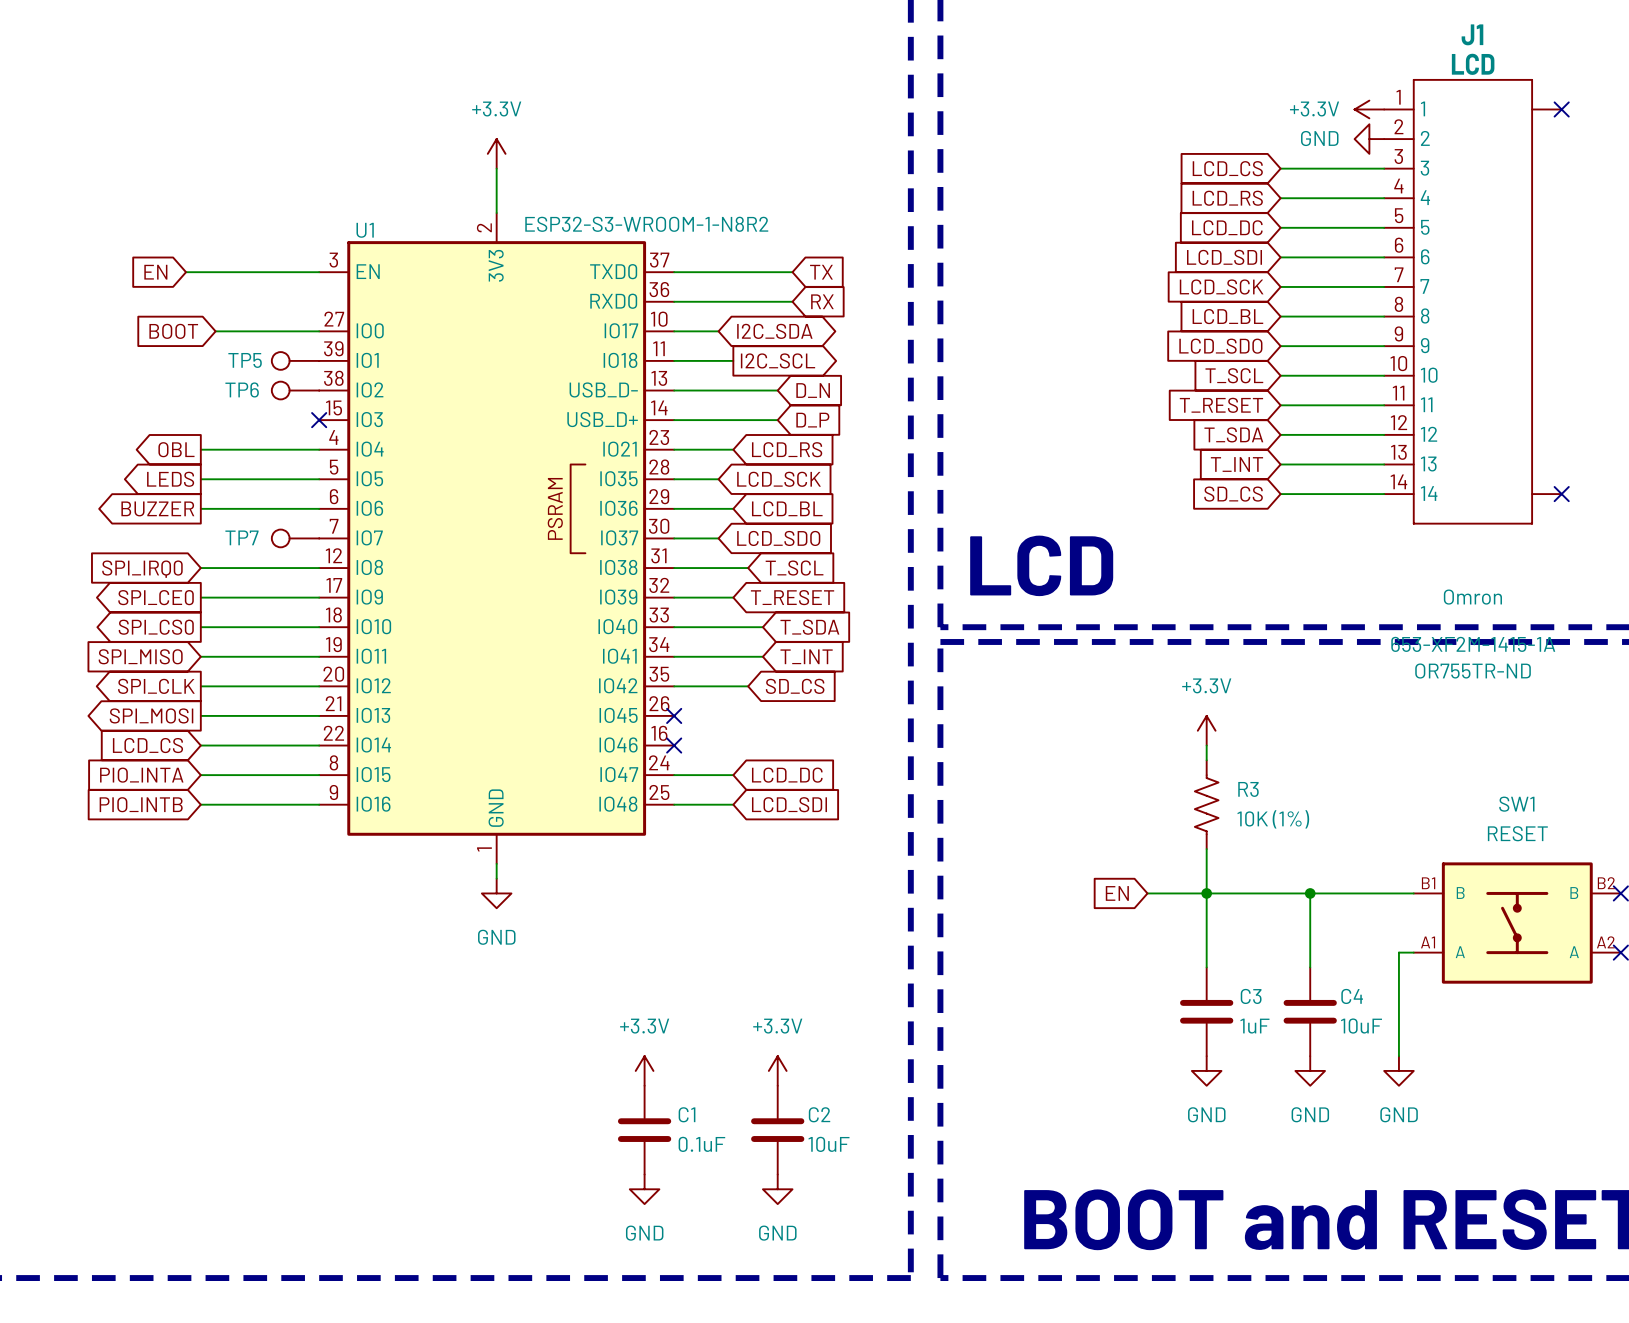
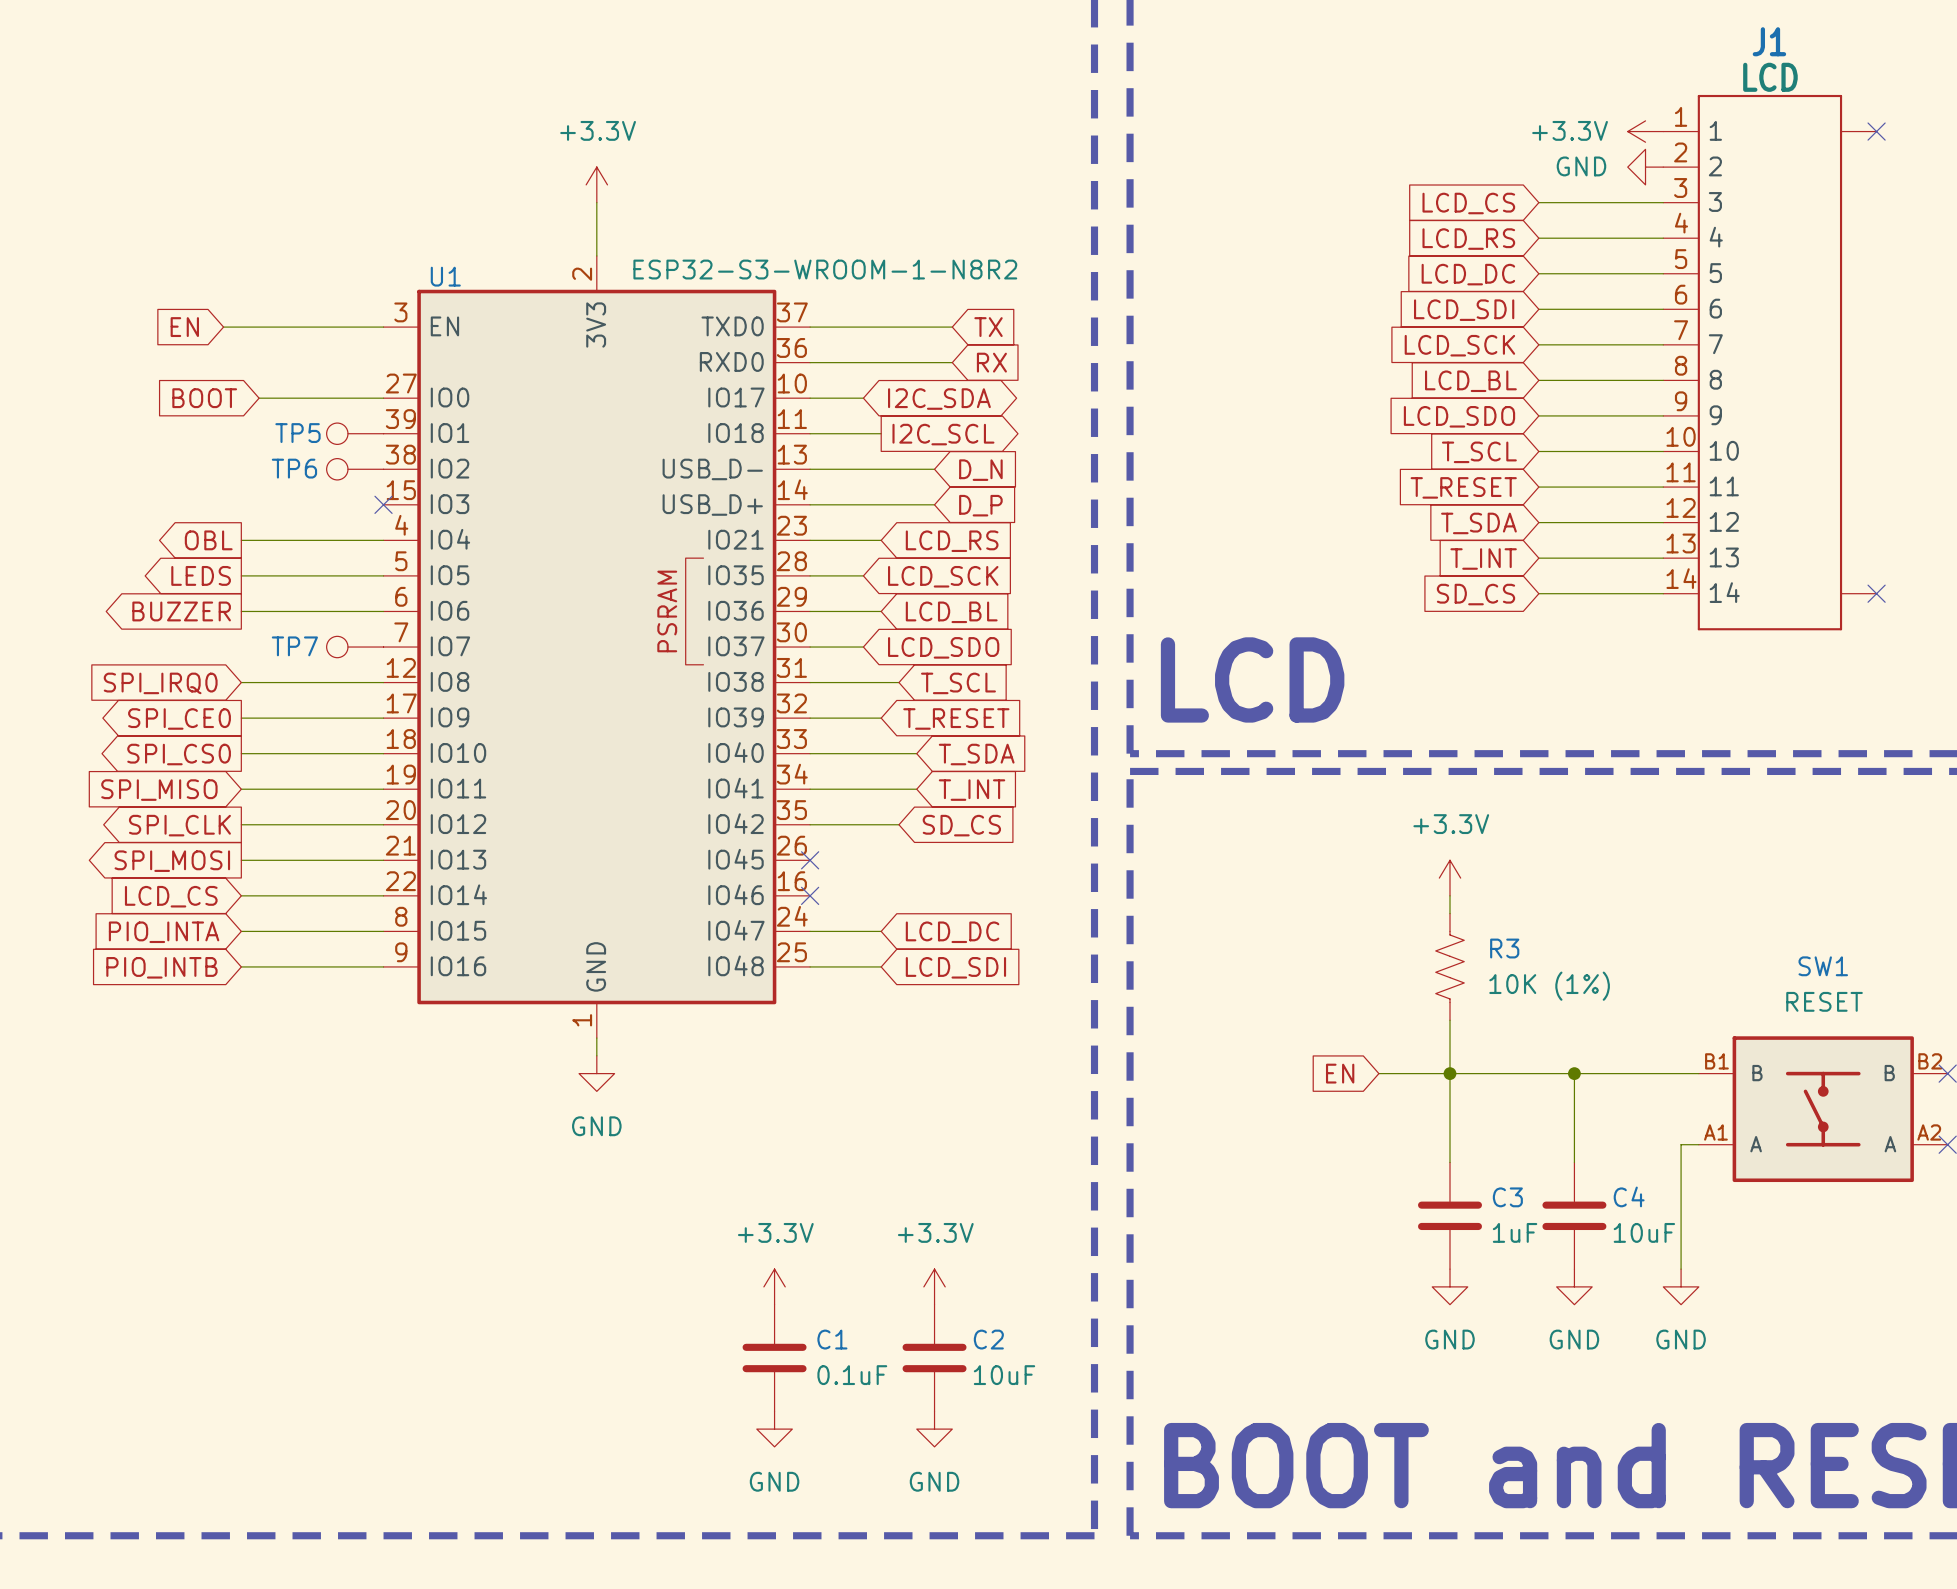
J1 text: Omron (1472, 597) -> none
J1 text: 653-XF2M-1415-1A (1473, 644) -> none
J1 text: OR755TR-ND (1473, 671) -> none

